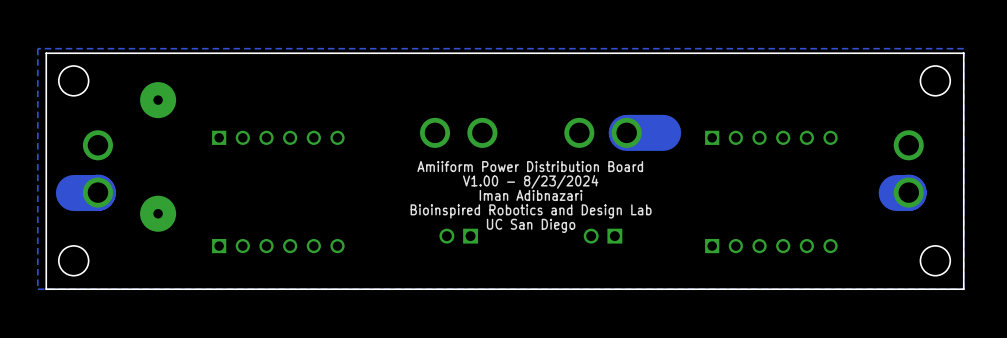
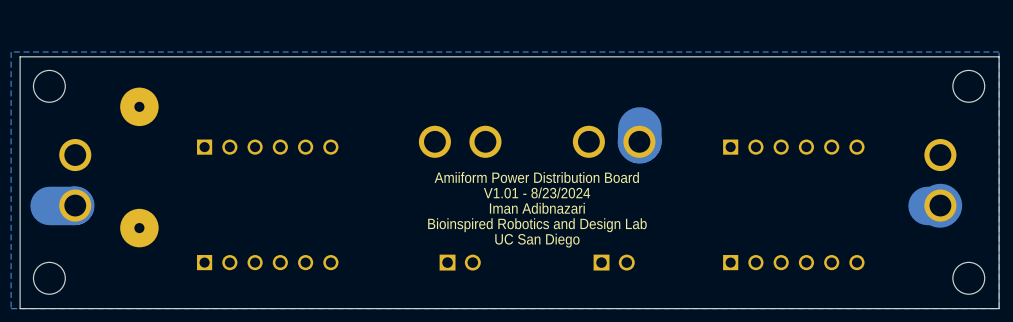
track: (663, 132) (626, 132) -> (639, 128) (639, 141)
text: V1.00 - 8/23/2024 (530, 181) -> V1.01 - 8/23/2024 (537, 192)
part rotation: 0° (458, 236) -> 180° (460, 262)
part rotation: 0° (603, 236) -> 180° (614, 262)

